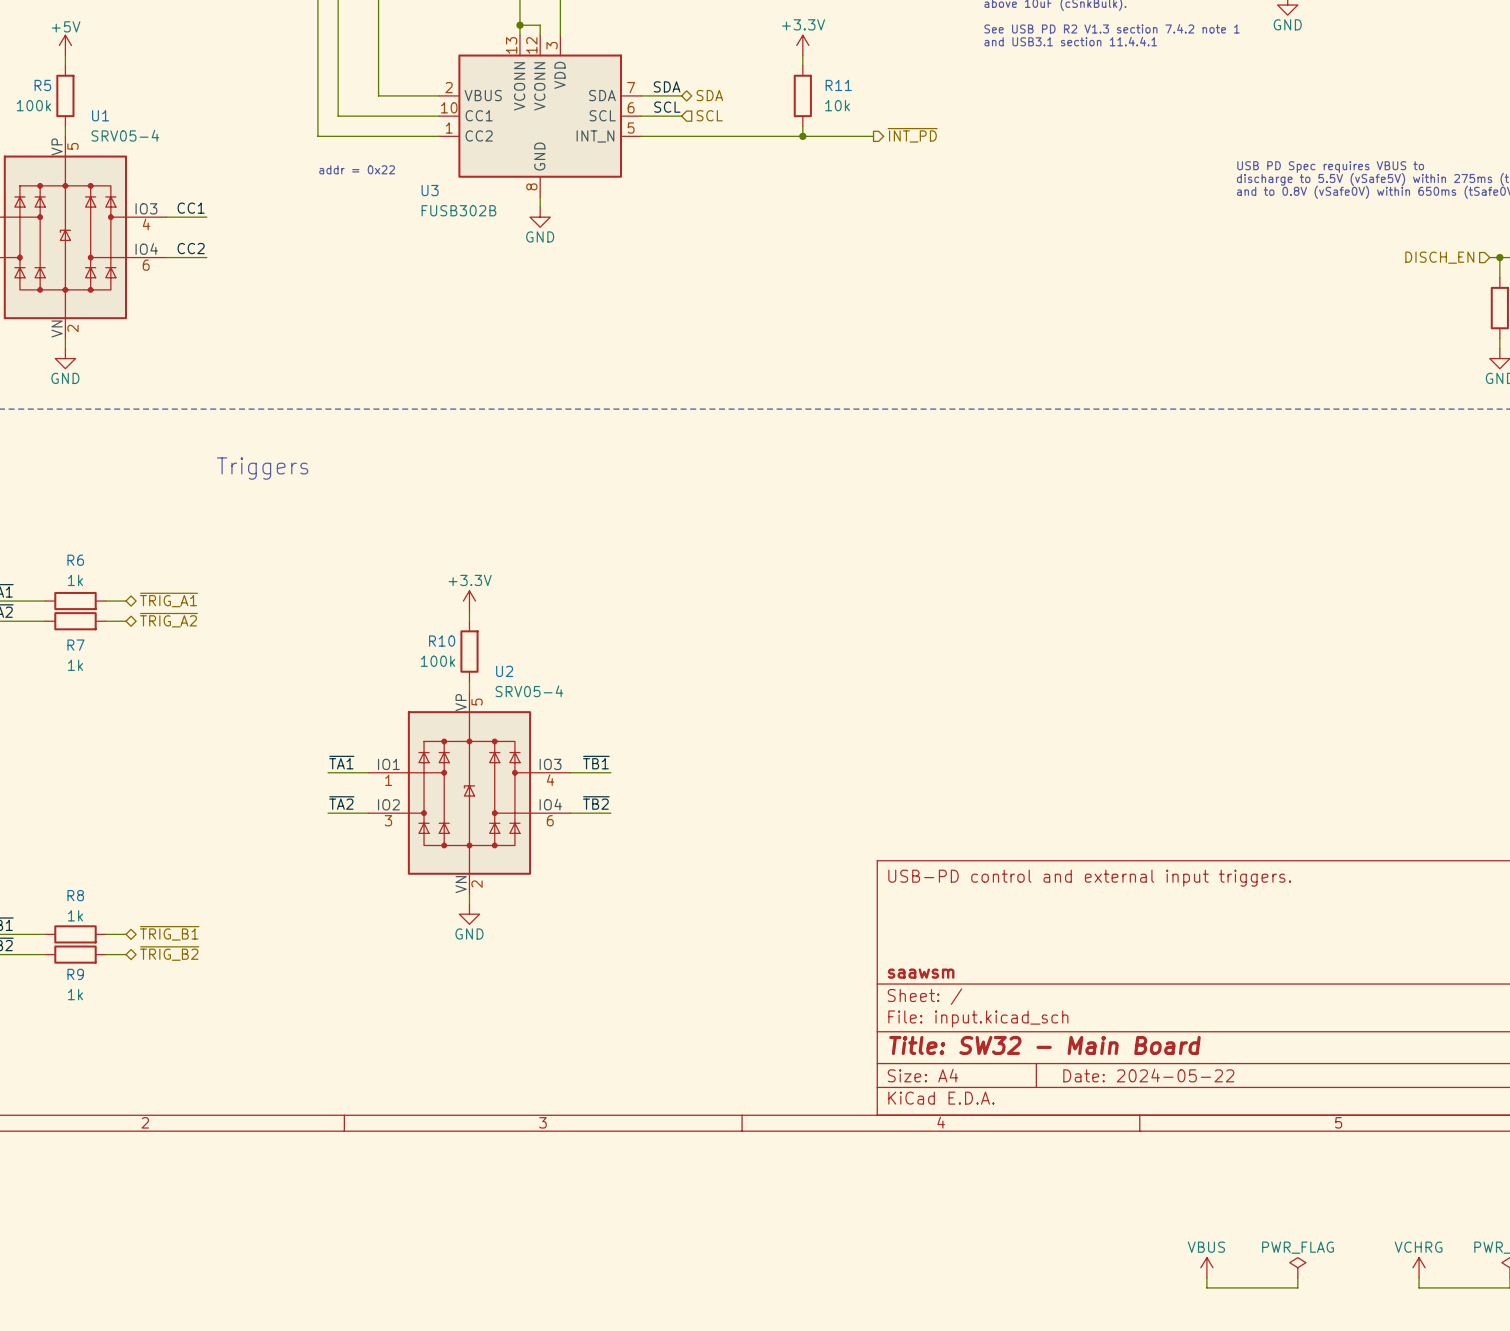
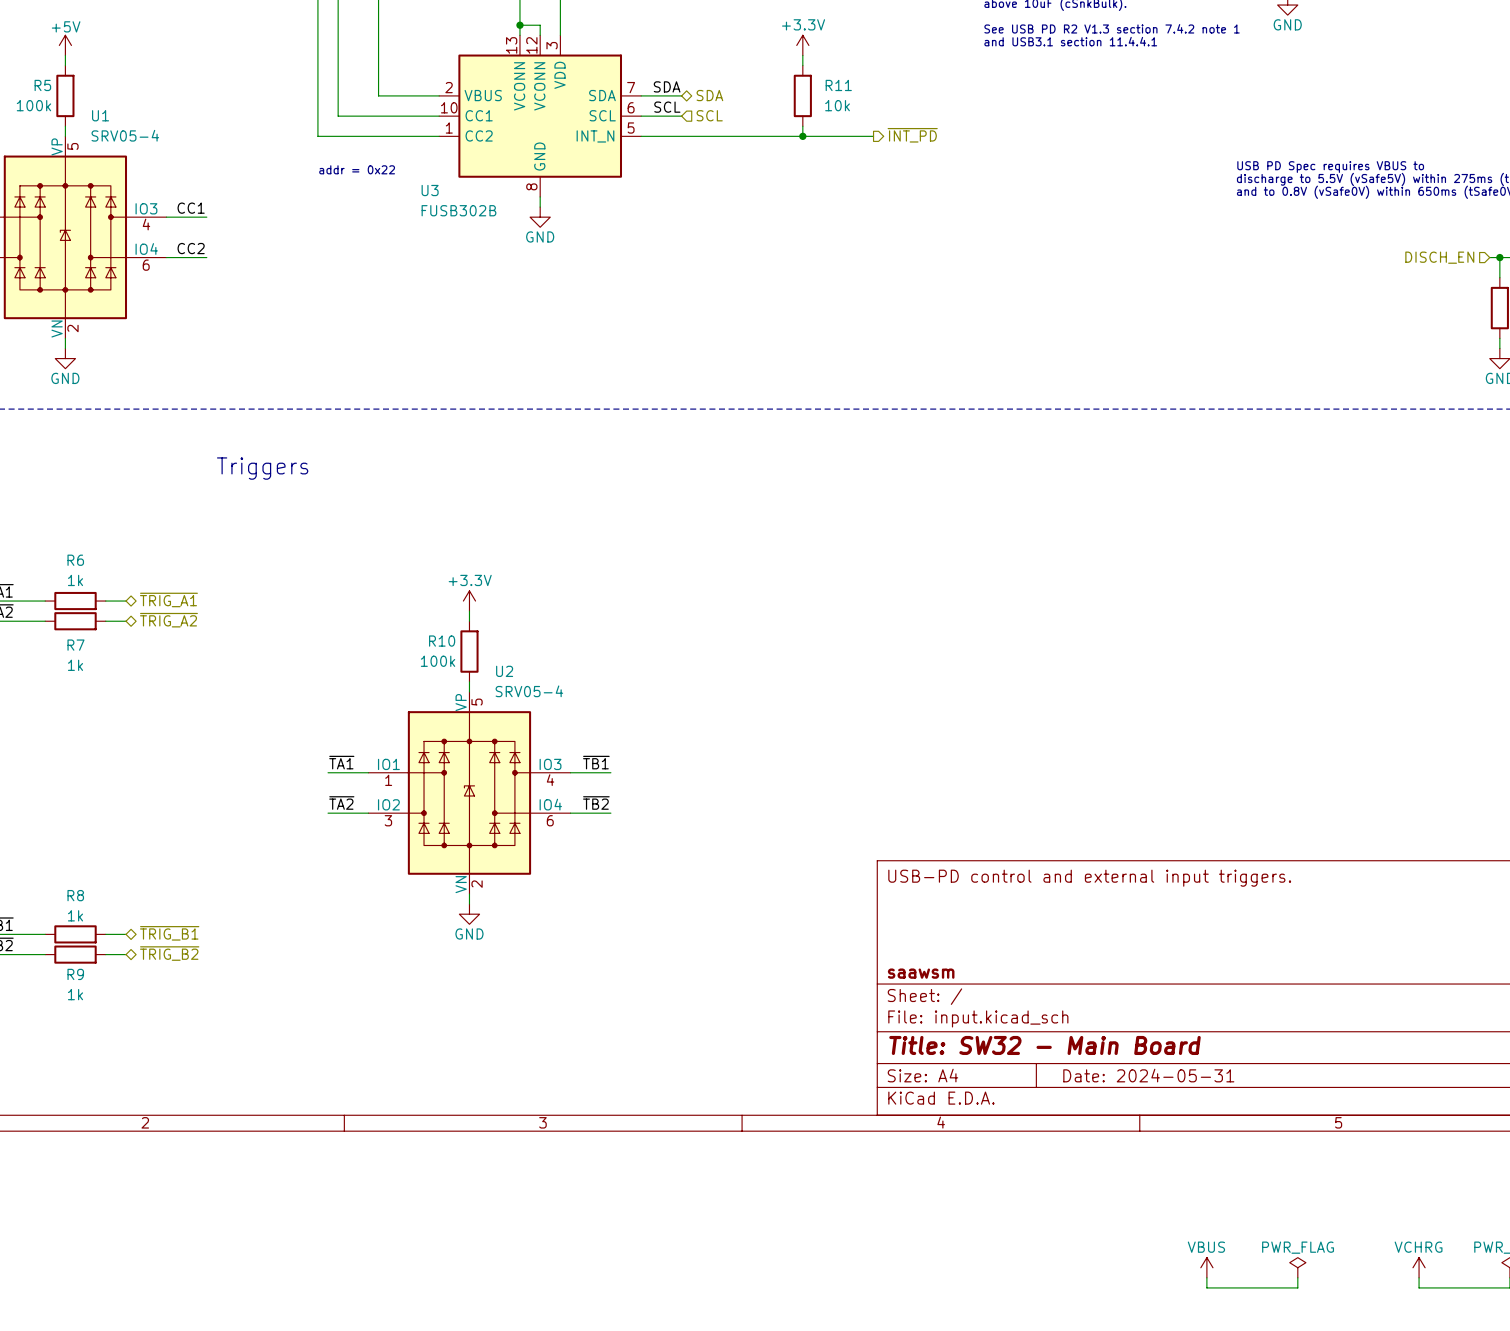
title block: Date: 2024-05-22 (1148, 1075) -> Date: 2024-05-31 (1148, 1075)

